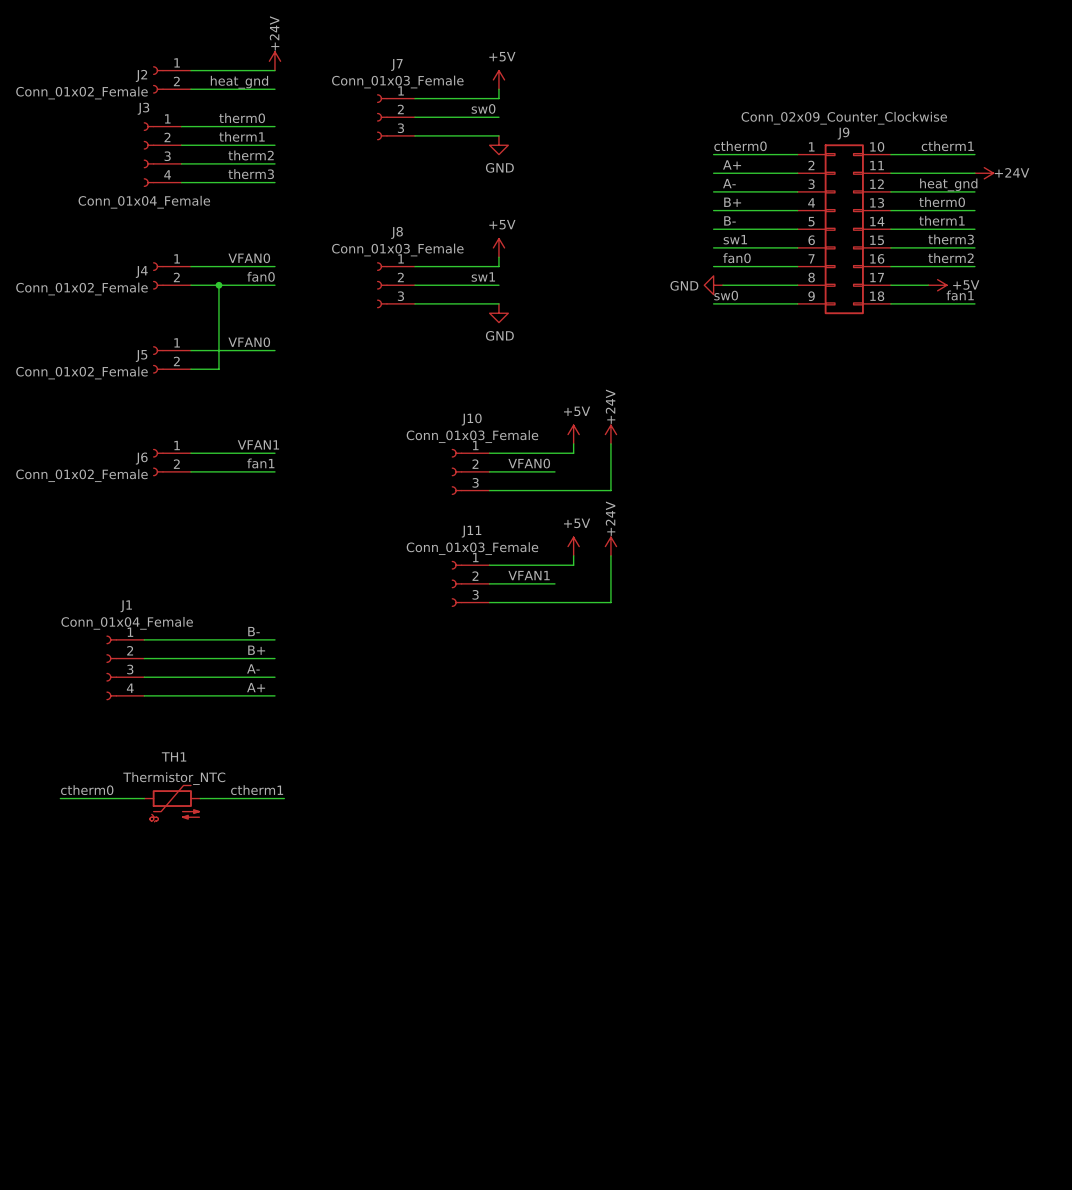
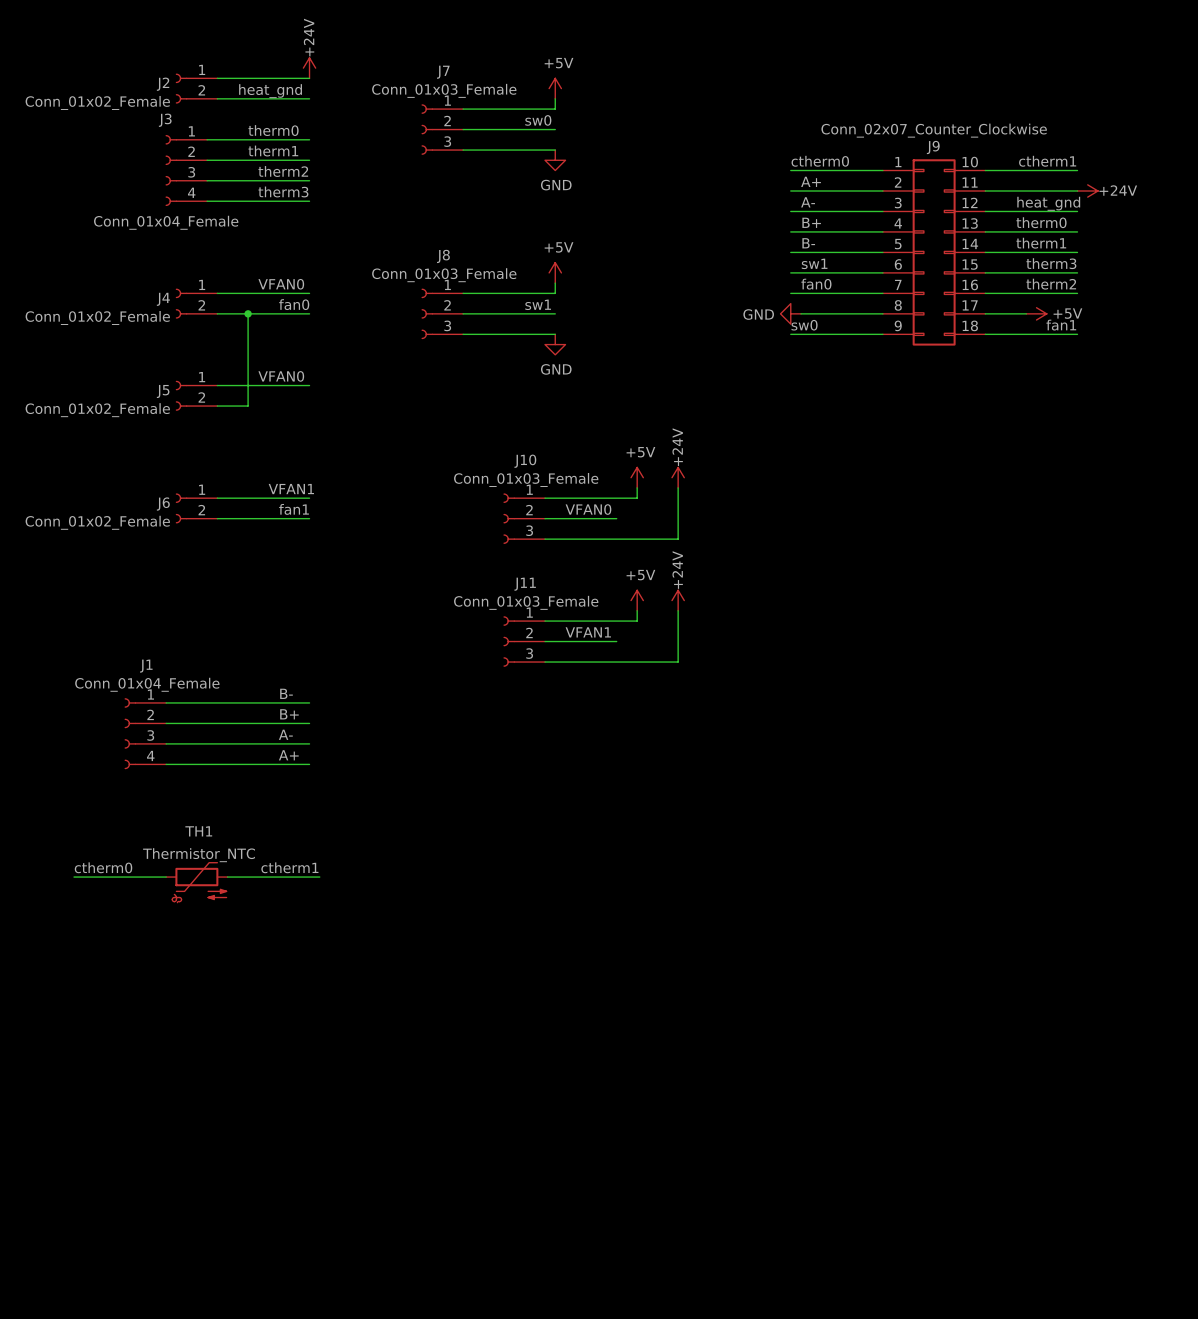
J9 value: Conn_02x09_Counter_Clockwise (844, 118) -> Conn_02x07_Counter_Clockwise (934, 130)

